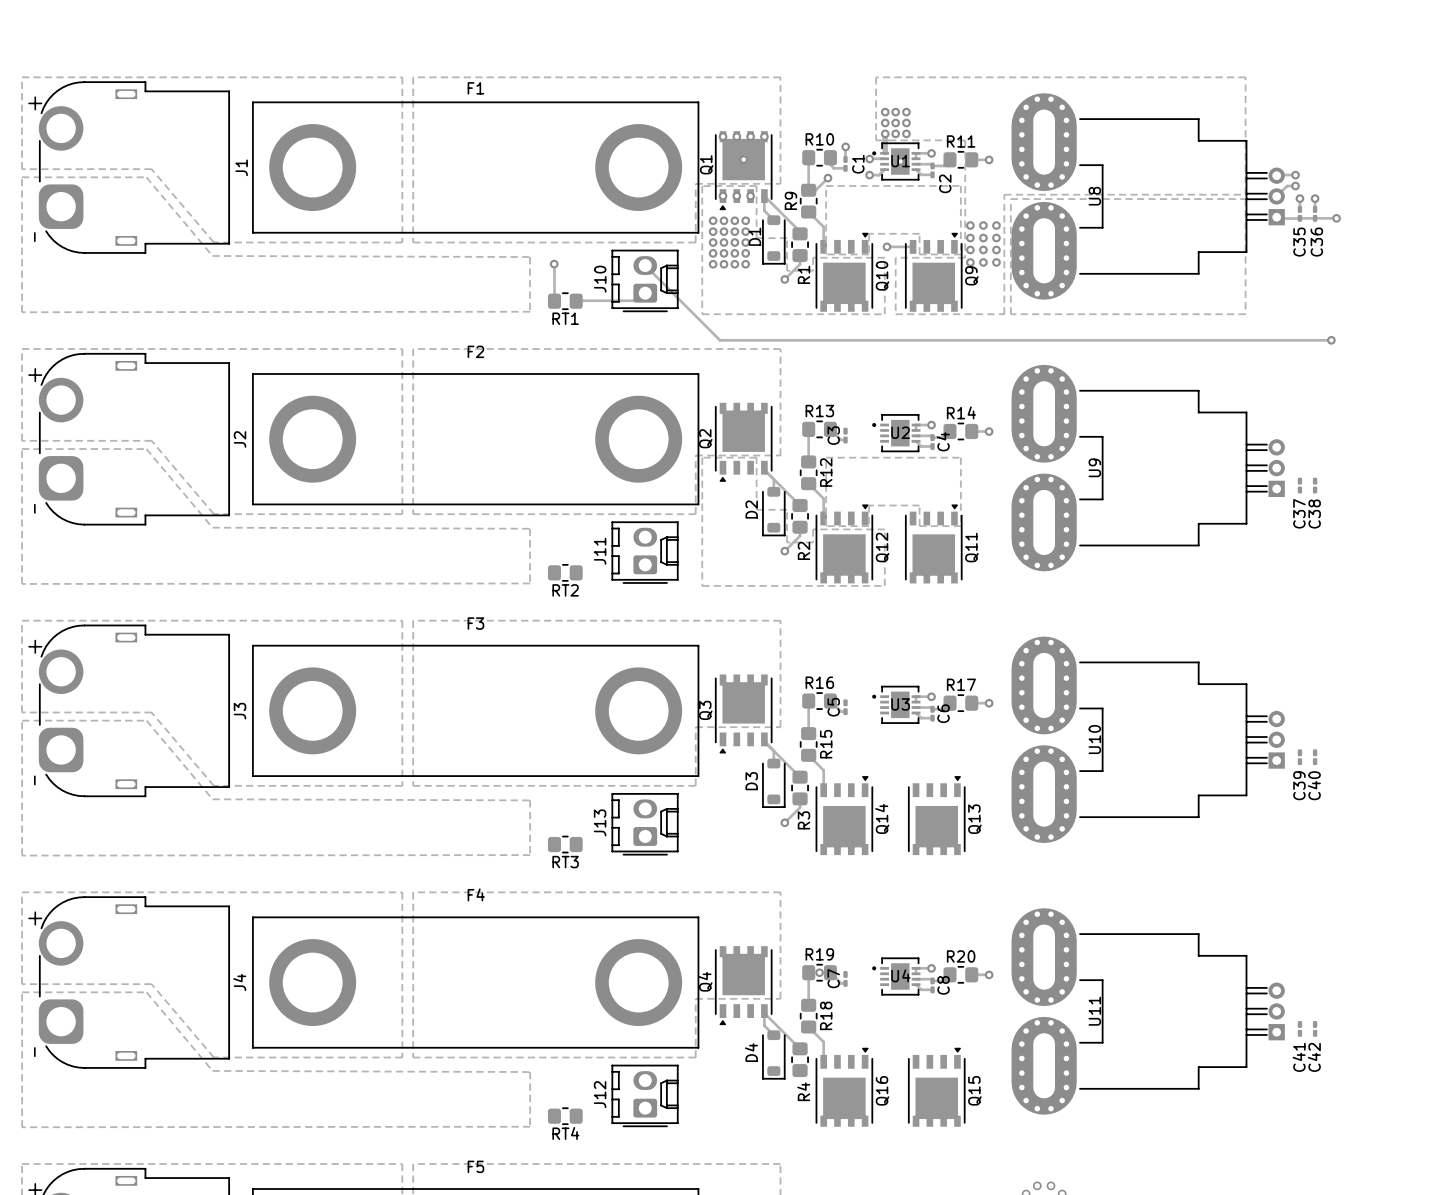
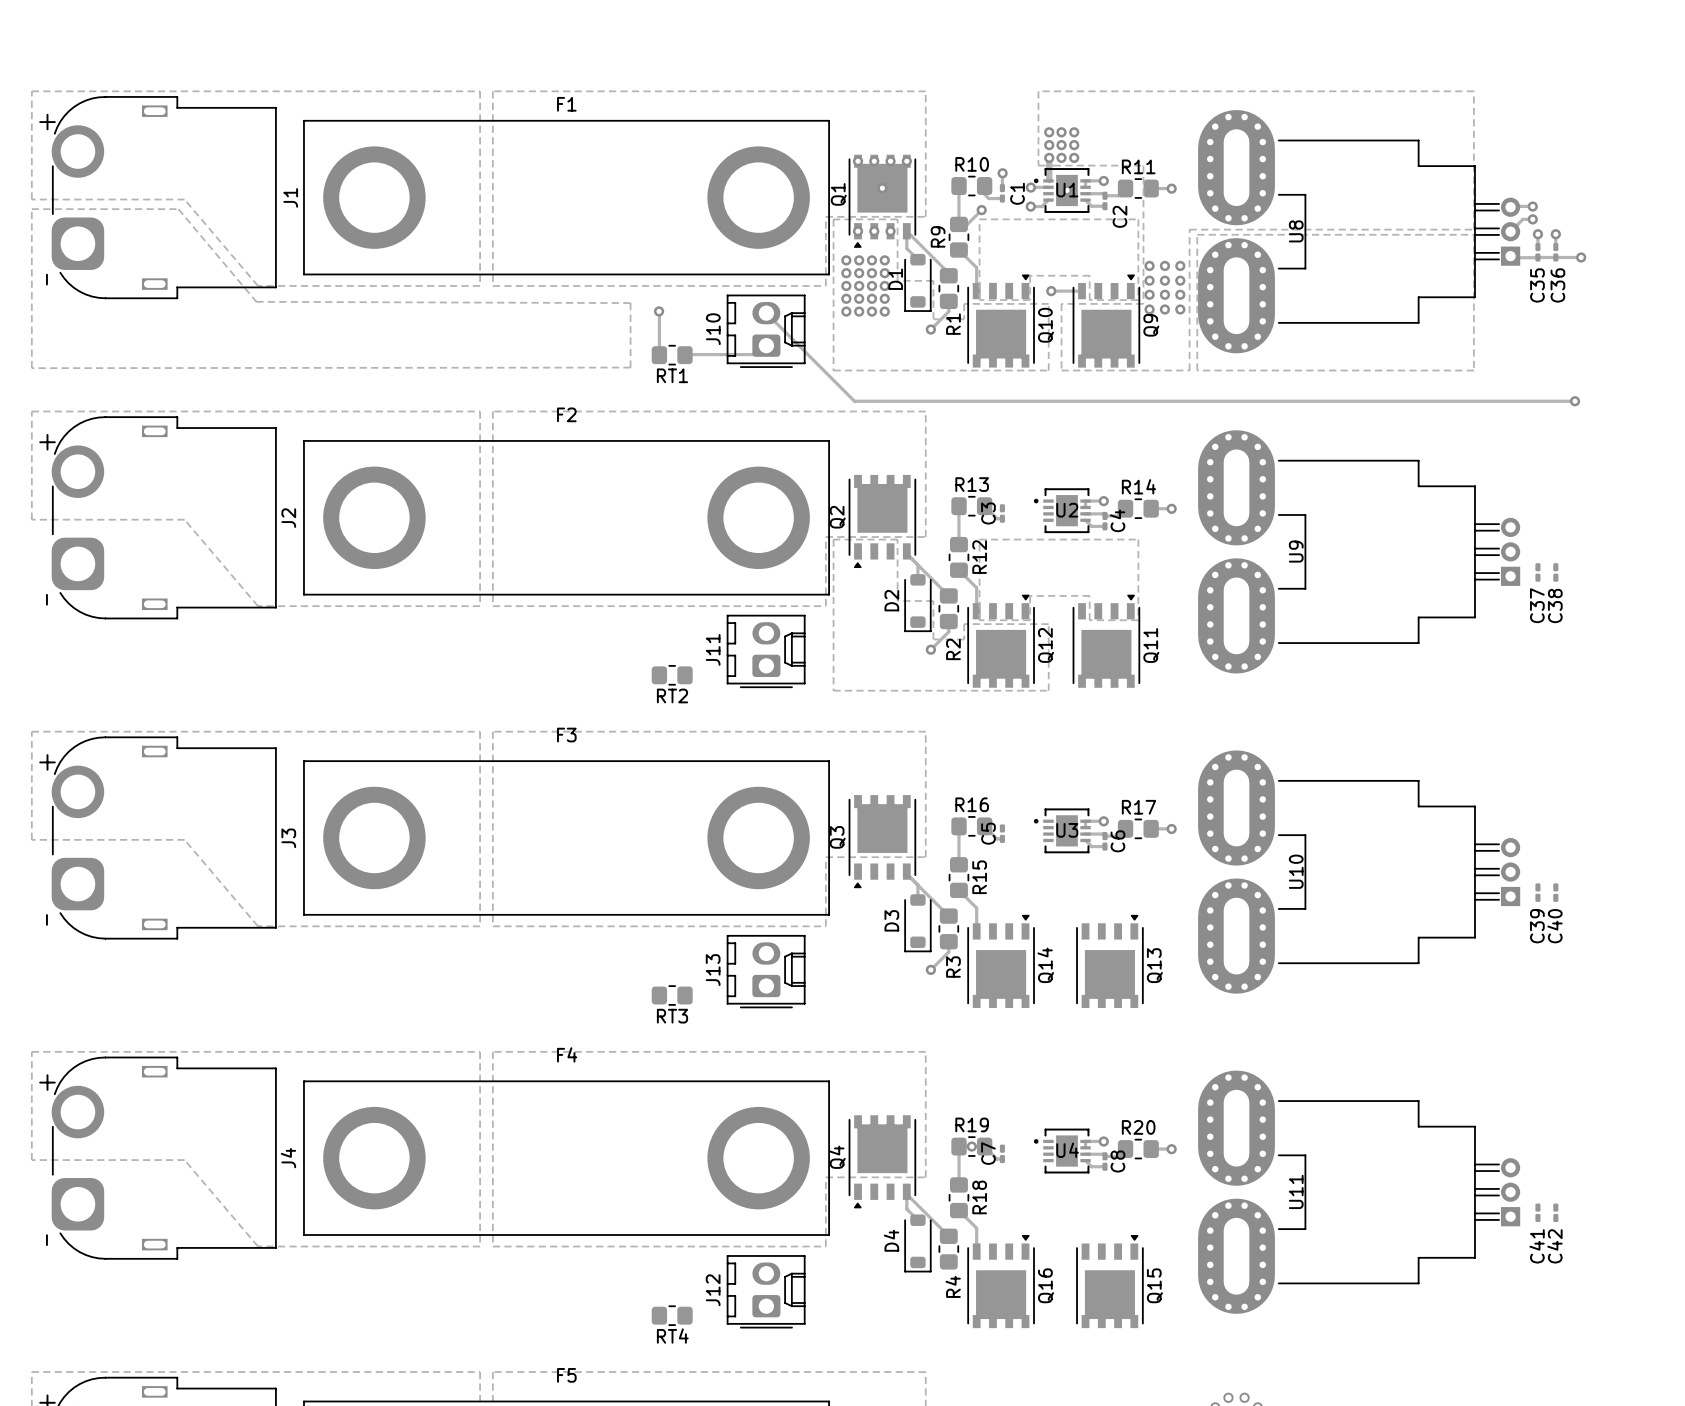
zone outline: (22, 449) (22, 583) (530, 583) (530, 528) (212, 527) (146, 449) (22, 449) -> none
zone outline: (22, 720) (22, 855) (530, 855) (530, 800) (212, 799) (146, 720) (22, 720) -> none
zone outline: (22, 992) (22, 1127) (530, 1126) (530, 1072) (212, 1070) (146, 992) (22, 992) -> none

